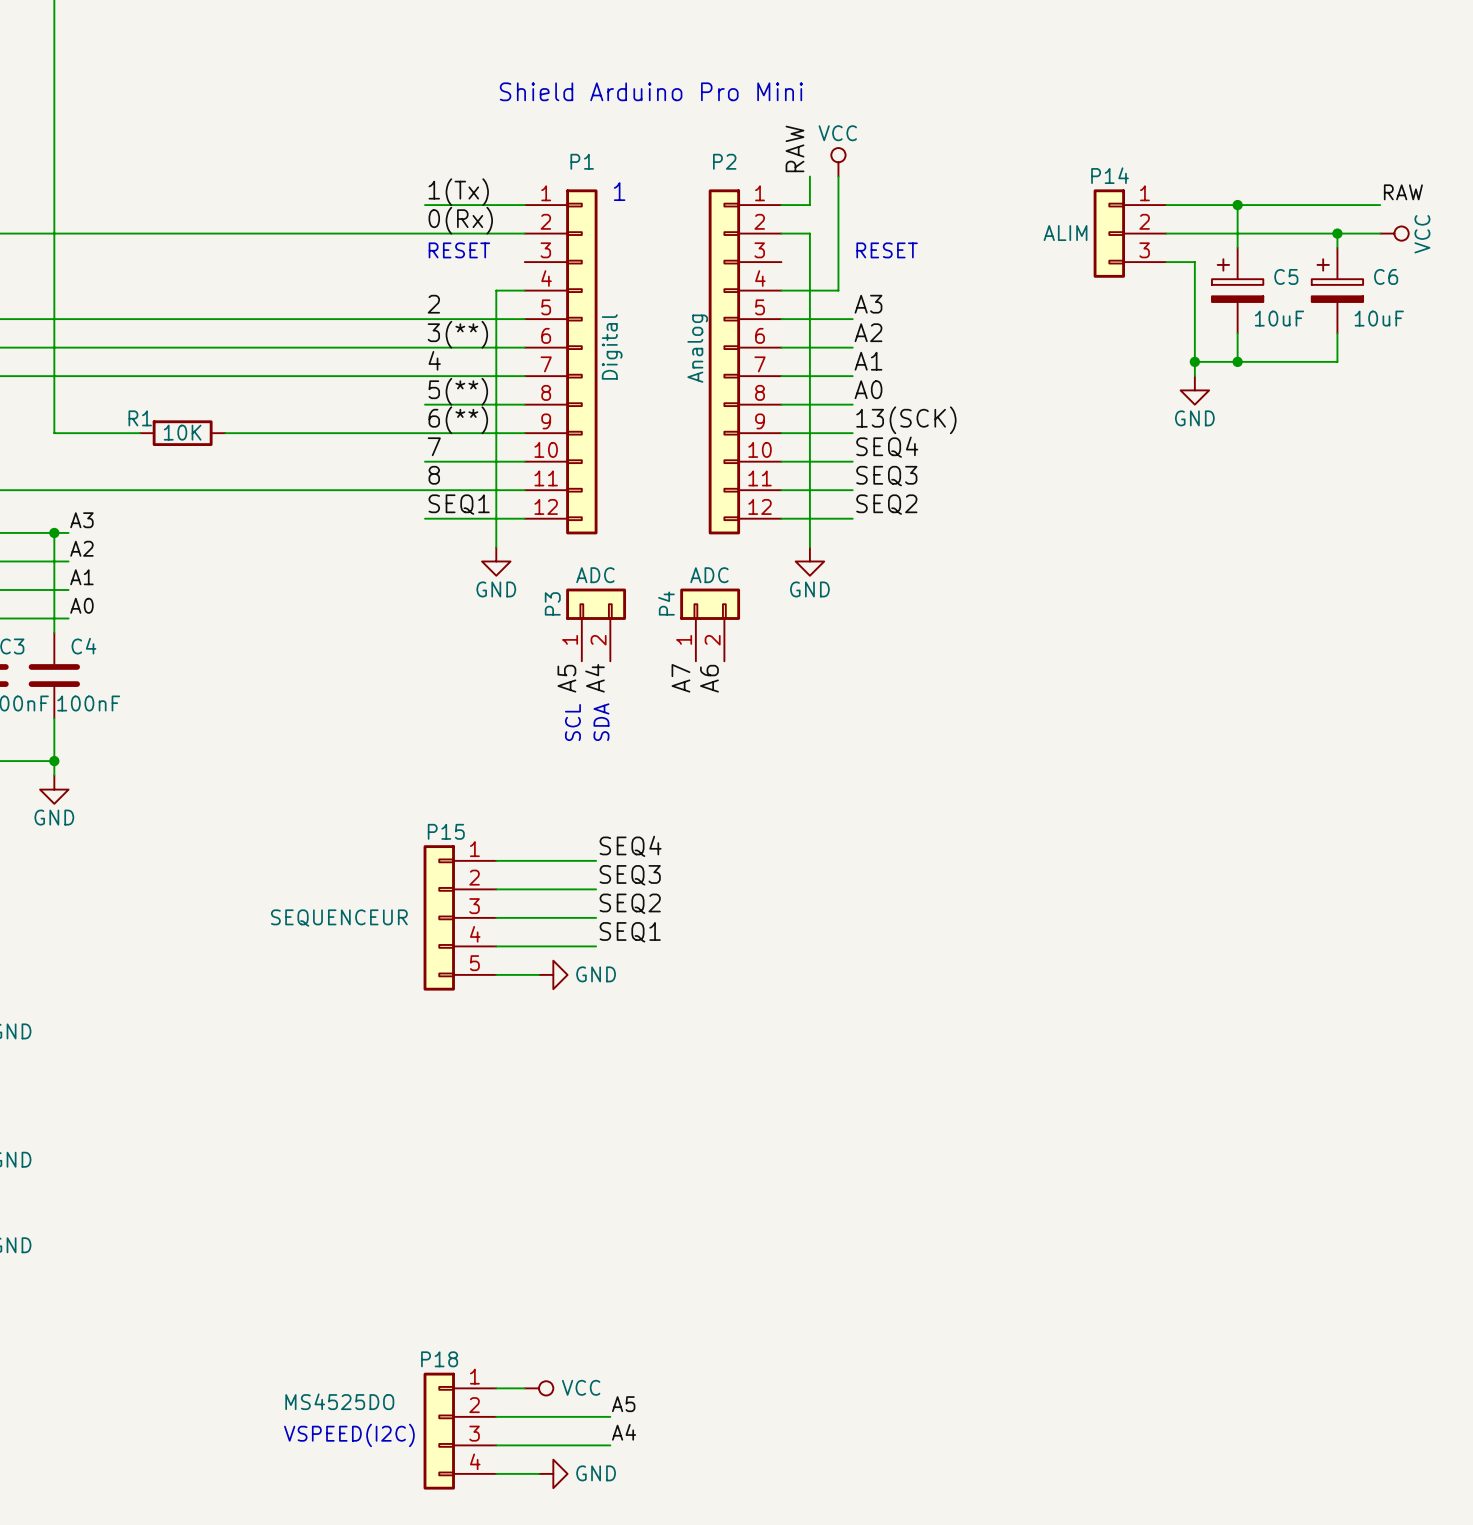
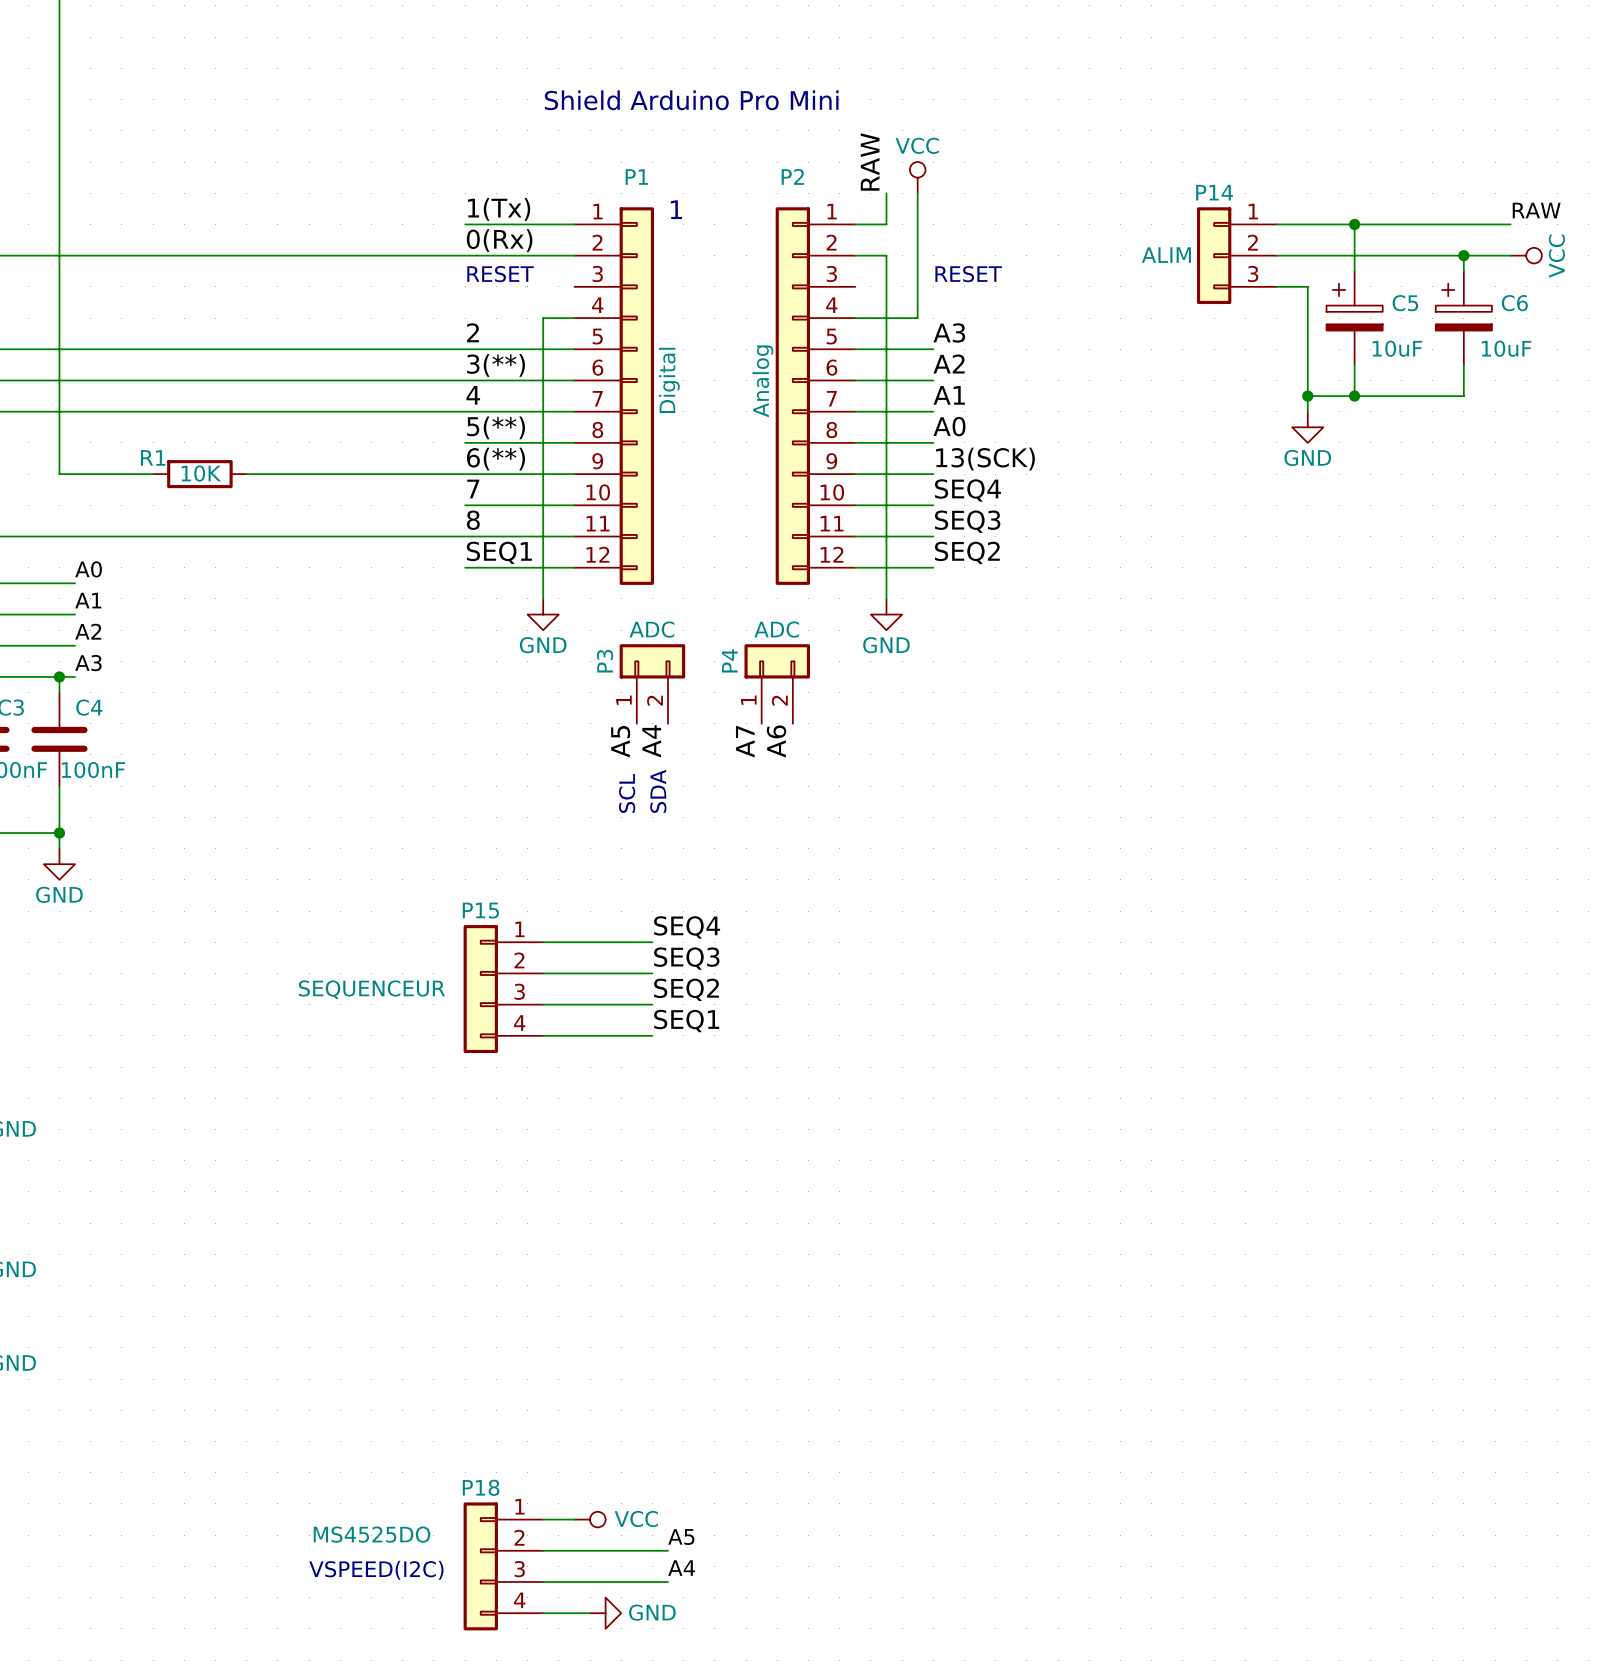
label: A3 (81, 520) -> A0 (88, 569)
wire: (54, 532) (54, 618) -> none
junction: (54, 532) -> none
label: A2 (81, 548) -> A1 (88, 600)
label: A1 (81, 577) -> A2 (88, 631)
label: A0 (81, 605) -> A3 (88, 663)
junction: none -> (59, 676)
P15 symbol: [423, 845, 497, 991] -> [463, 925, 544, 1054]
wire: (496, 974) (539, 974) -> none
power symbol: GND (553, 974) -> none

